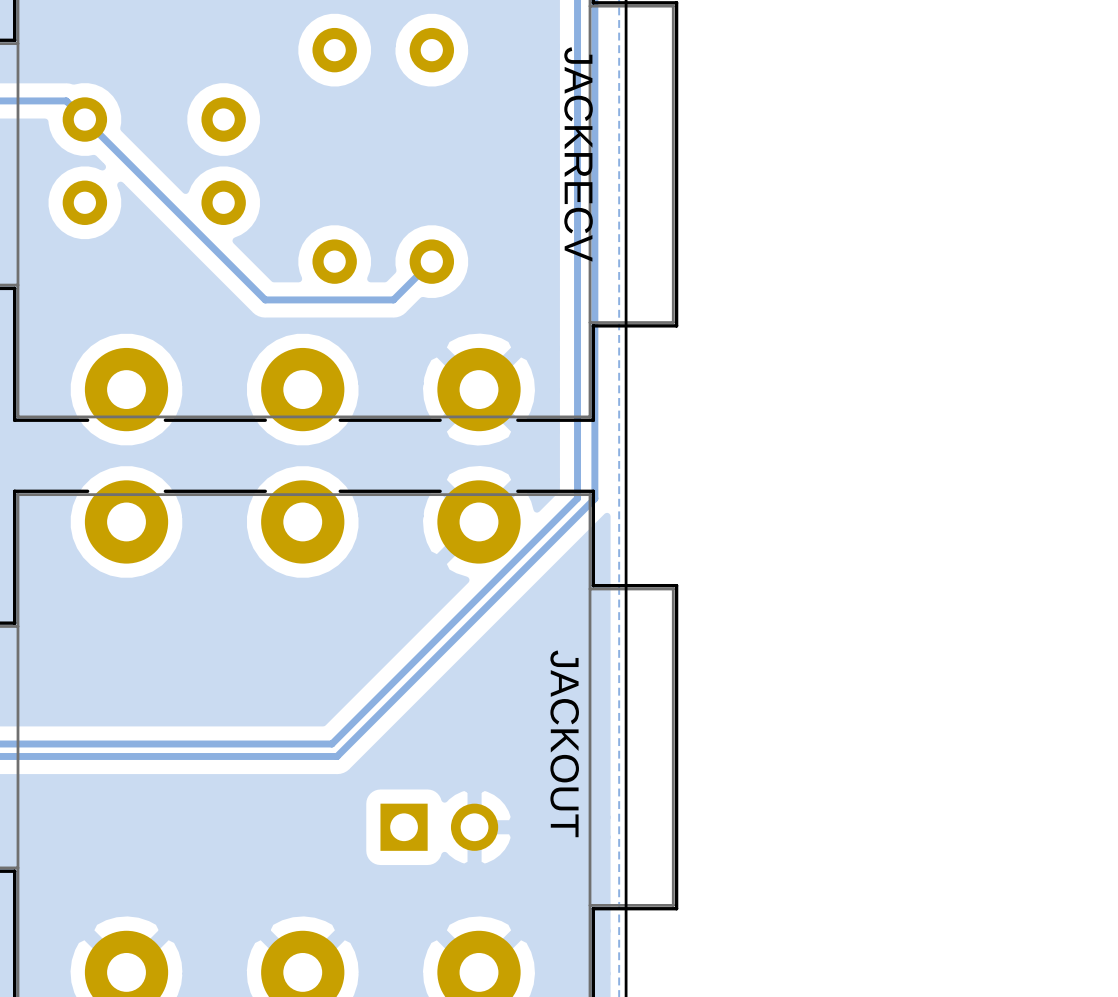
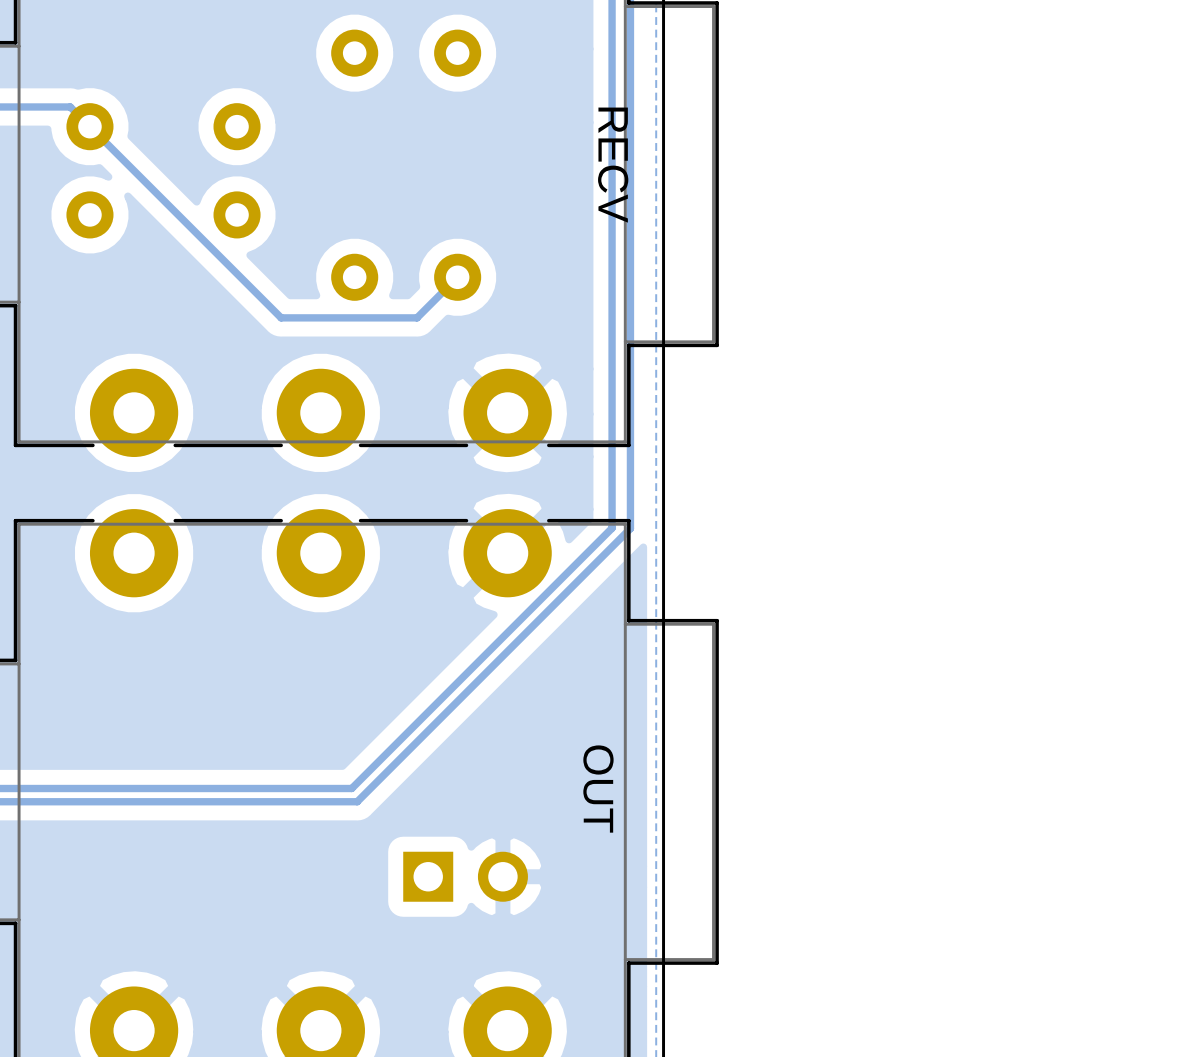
part value: JACKRECV (578, 154) -> RECV (613, 165)
part value: JACKOUT (564, 743) -> OUT (598, 789)

